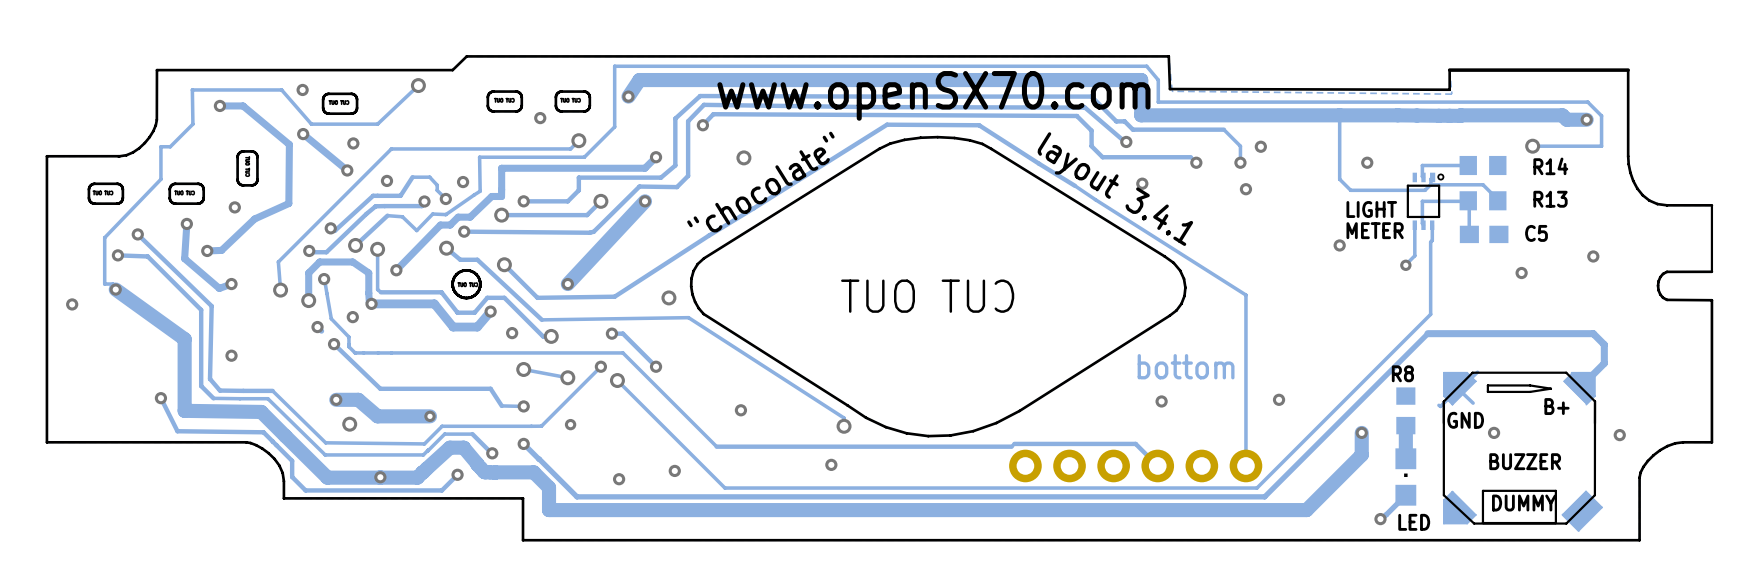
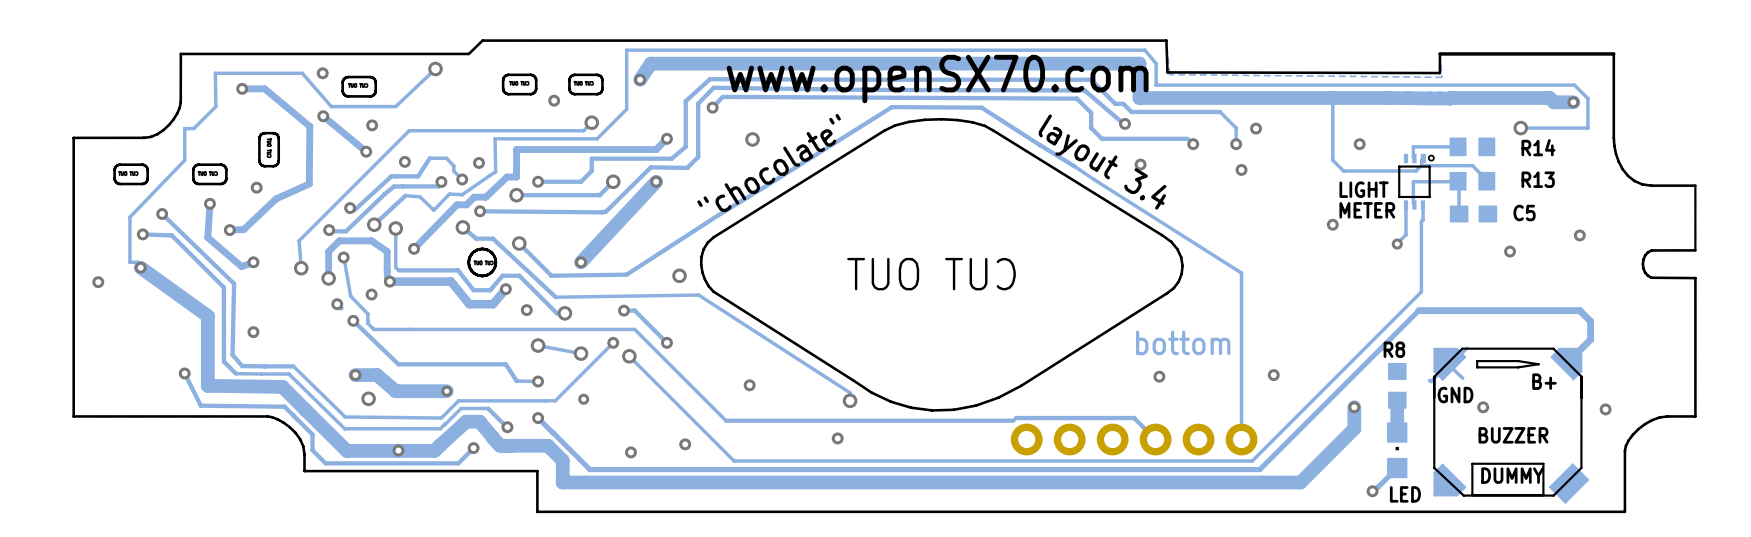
text: layout 3.4.1 (1115, 189) -> layout 3.4 (1102, 162)

